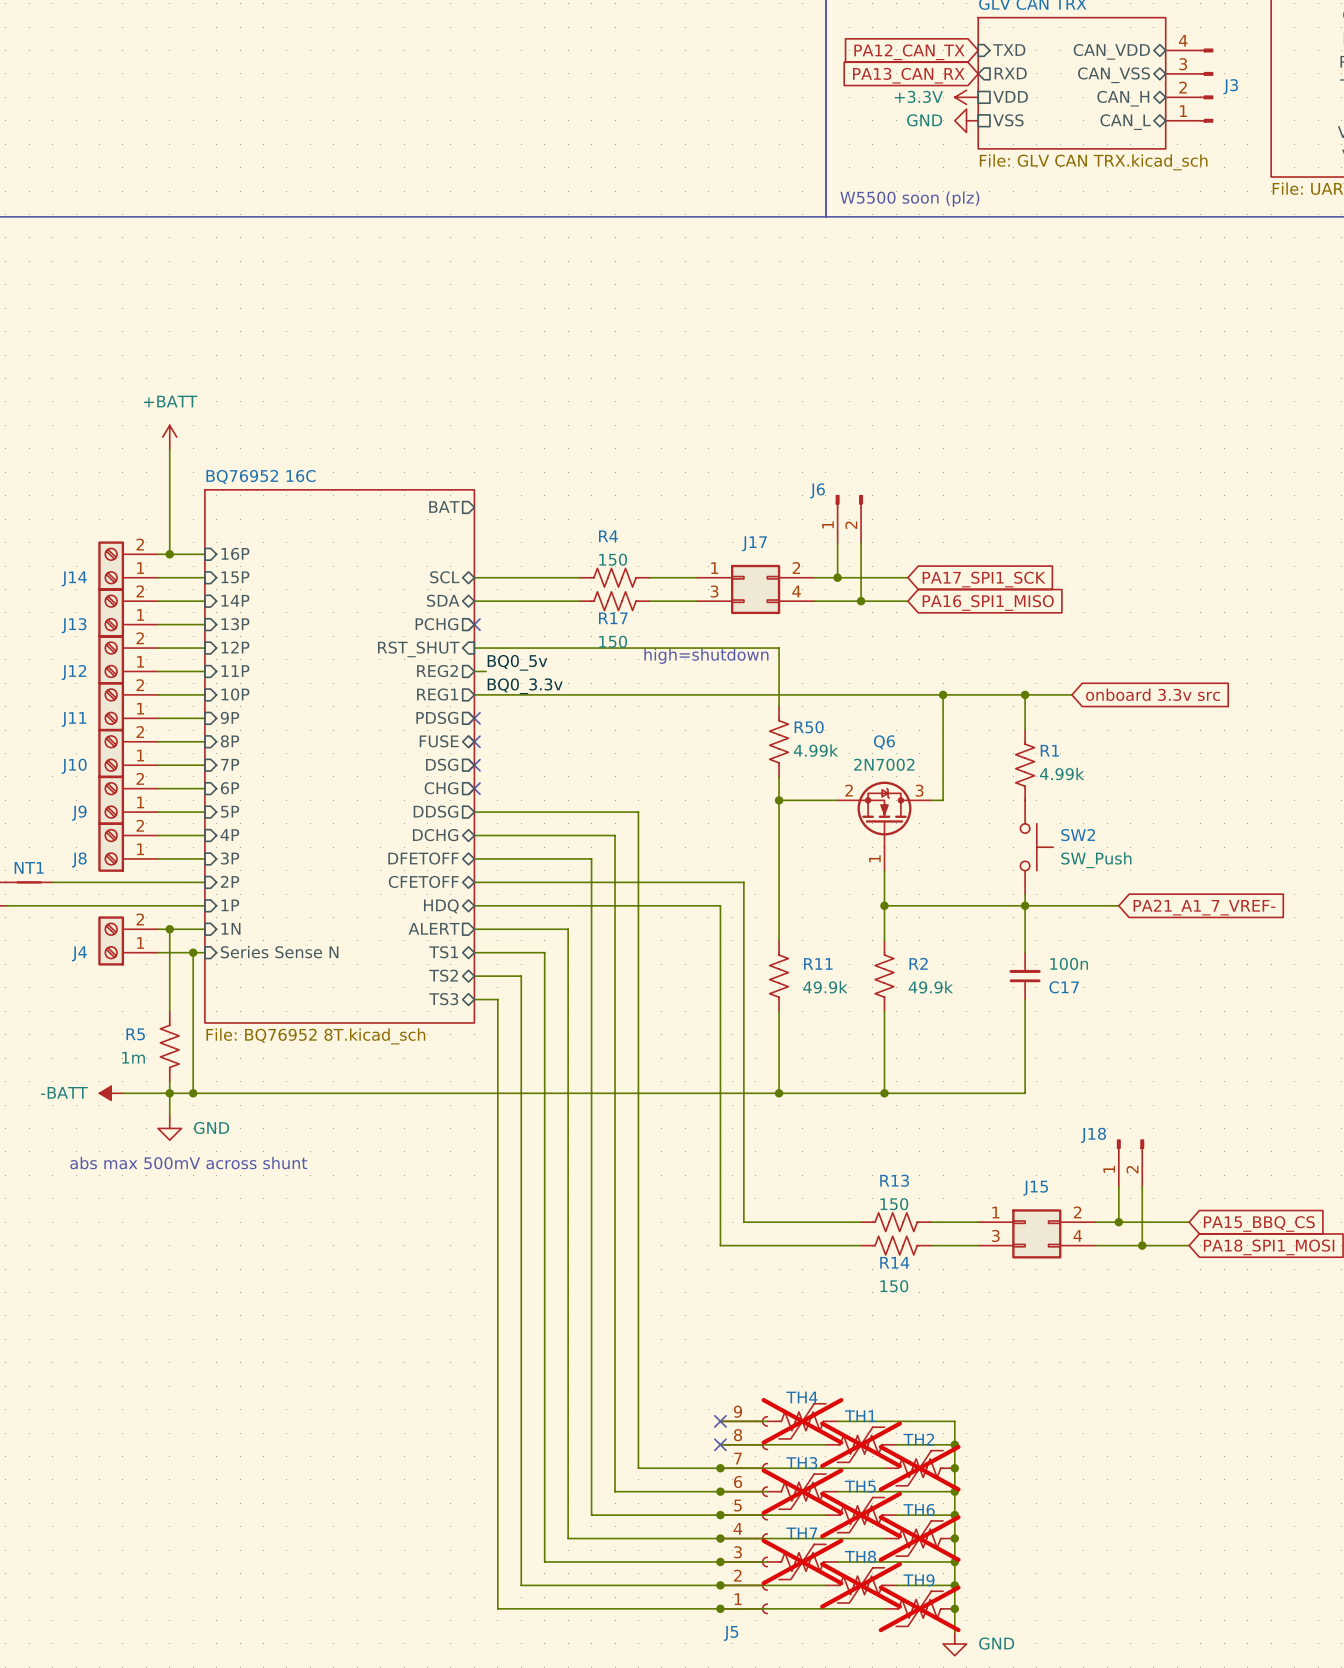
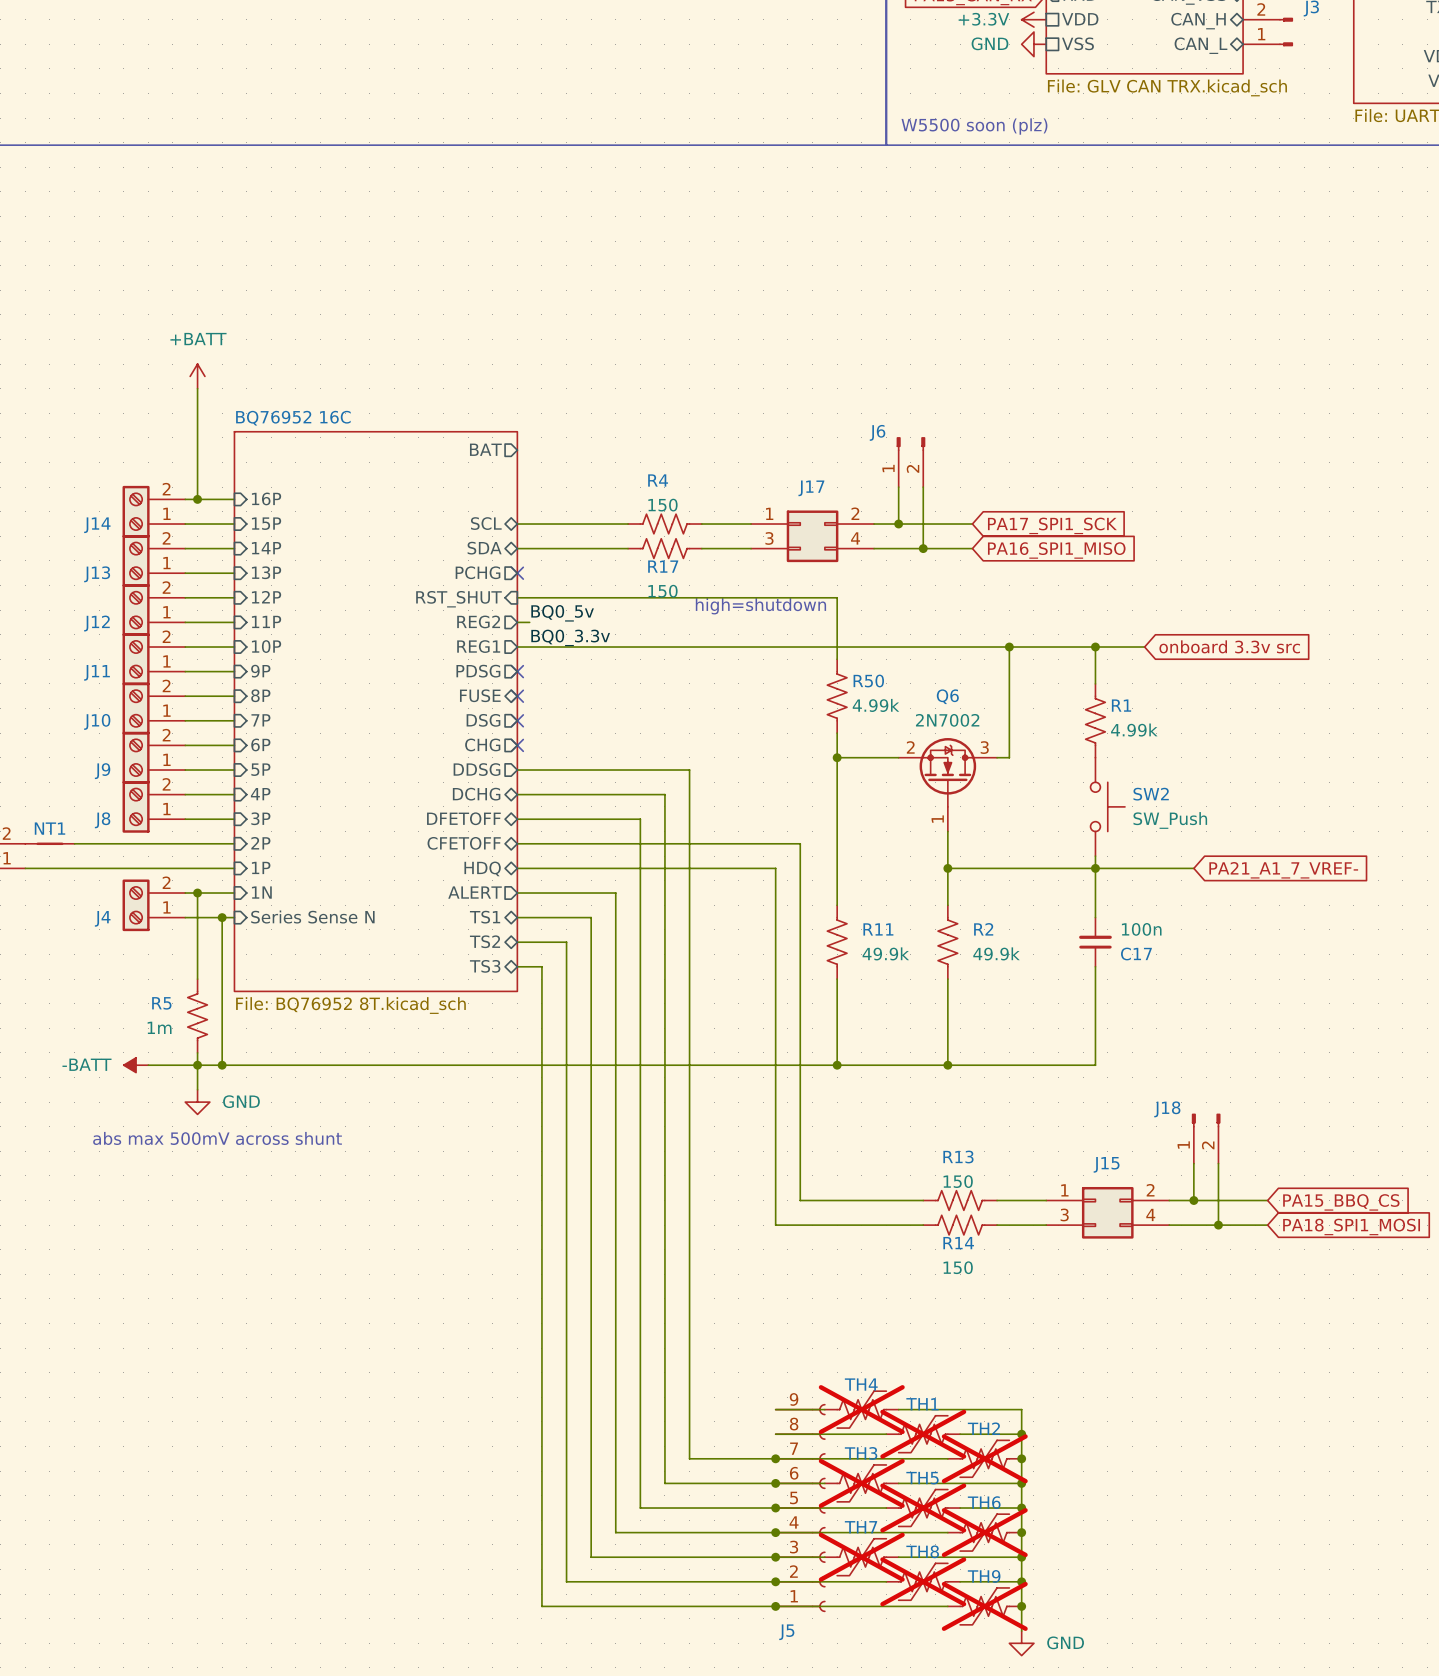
no-connect mark: (720, 1421) -> none
no-connect mark: (720, 1444) -> none

